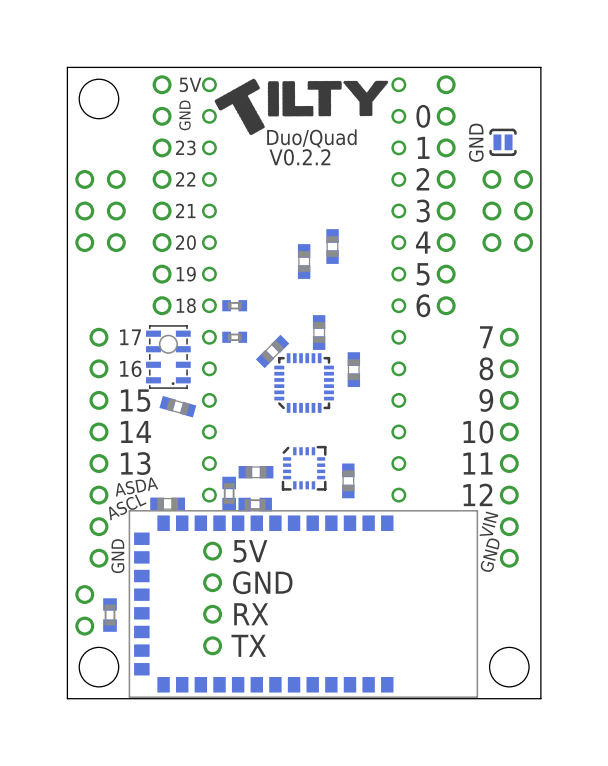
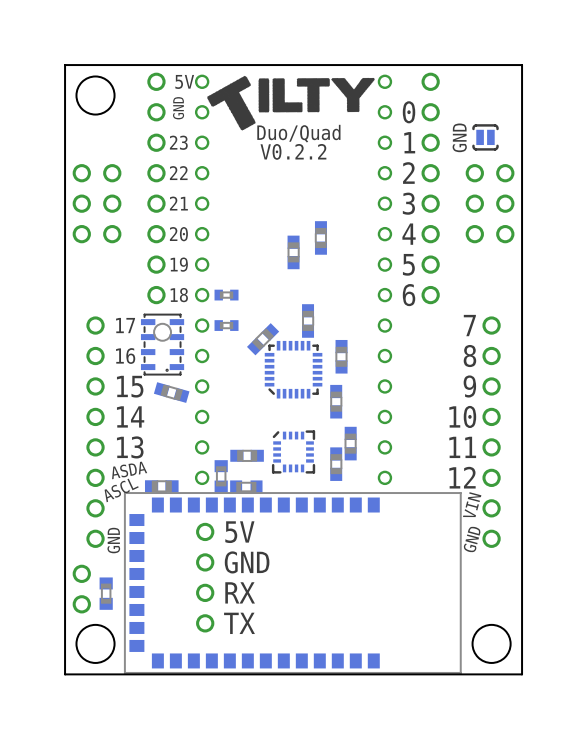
part: none -> (336, 401)
part: none -> (350, 443)

